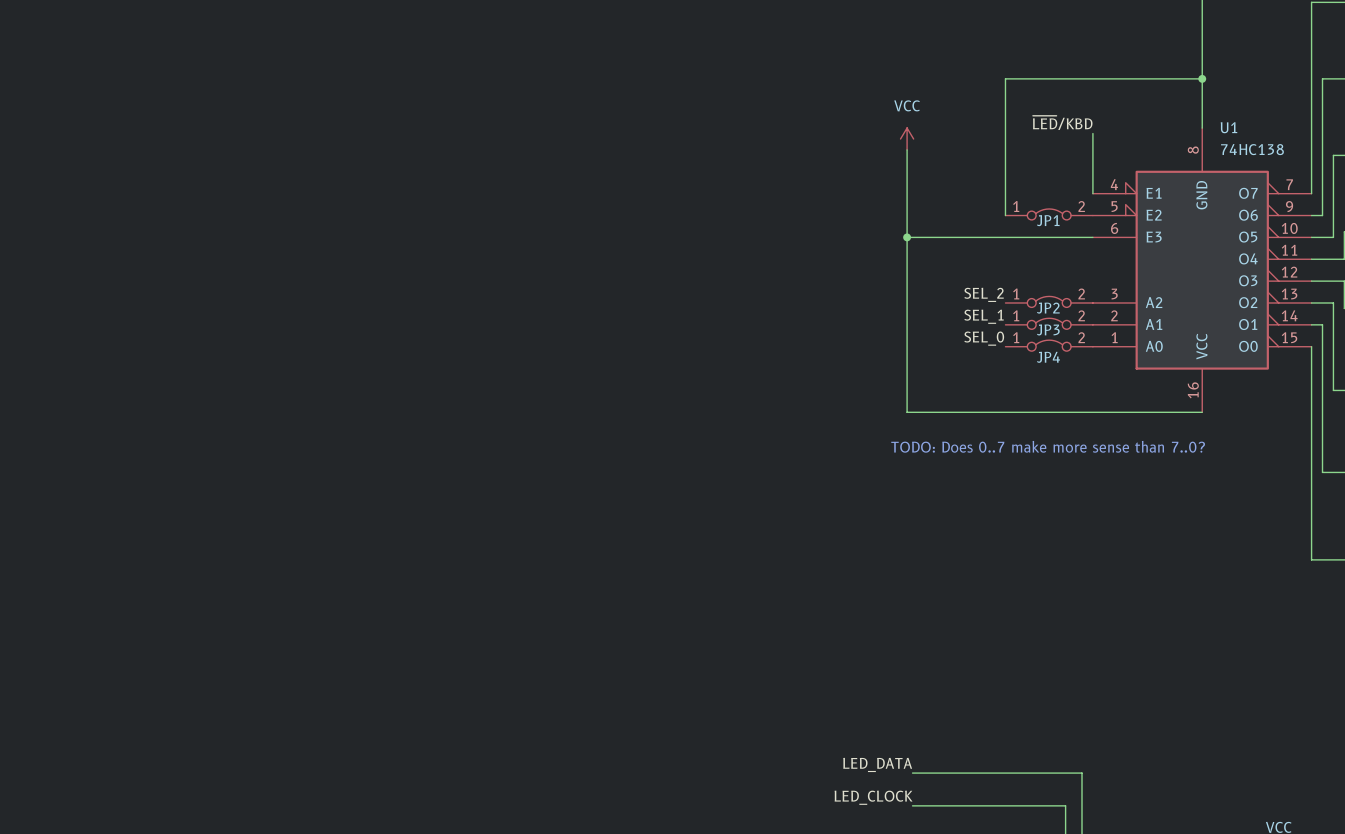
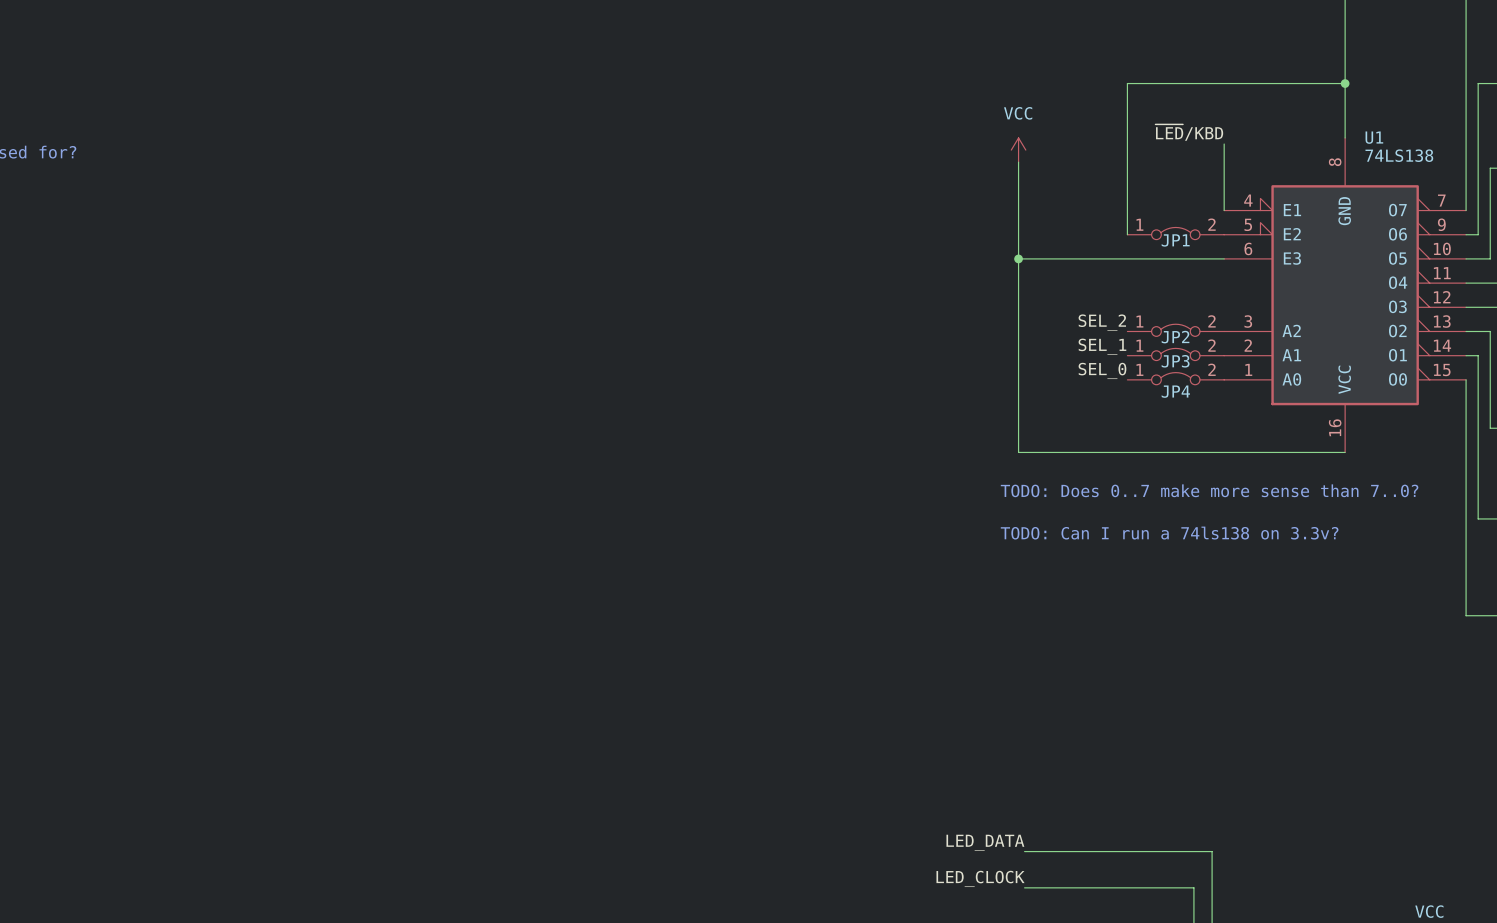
U1 value: 74HC138 (1252, 149) -> 74LS138 (1399, 155)
text: none -> TODO: Can I run a 74ls138 on 3.3v? (1169, 533)

